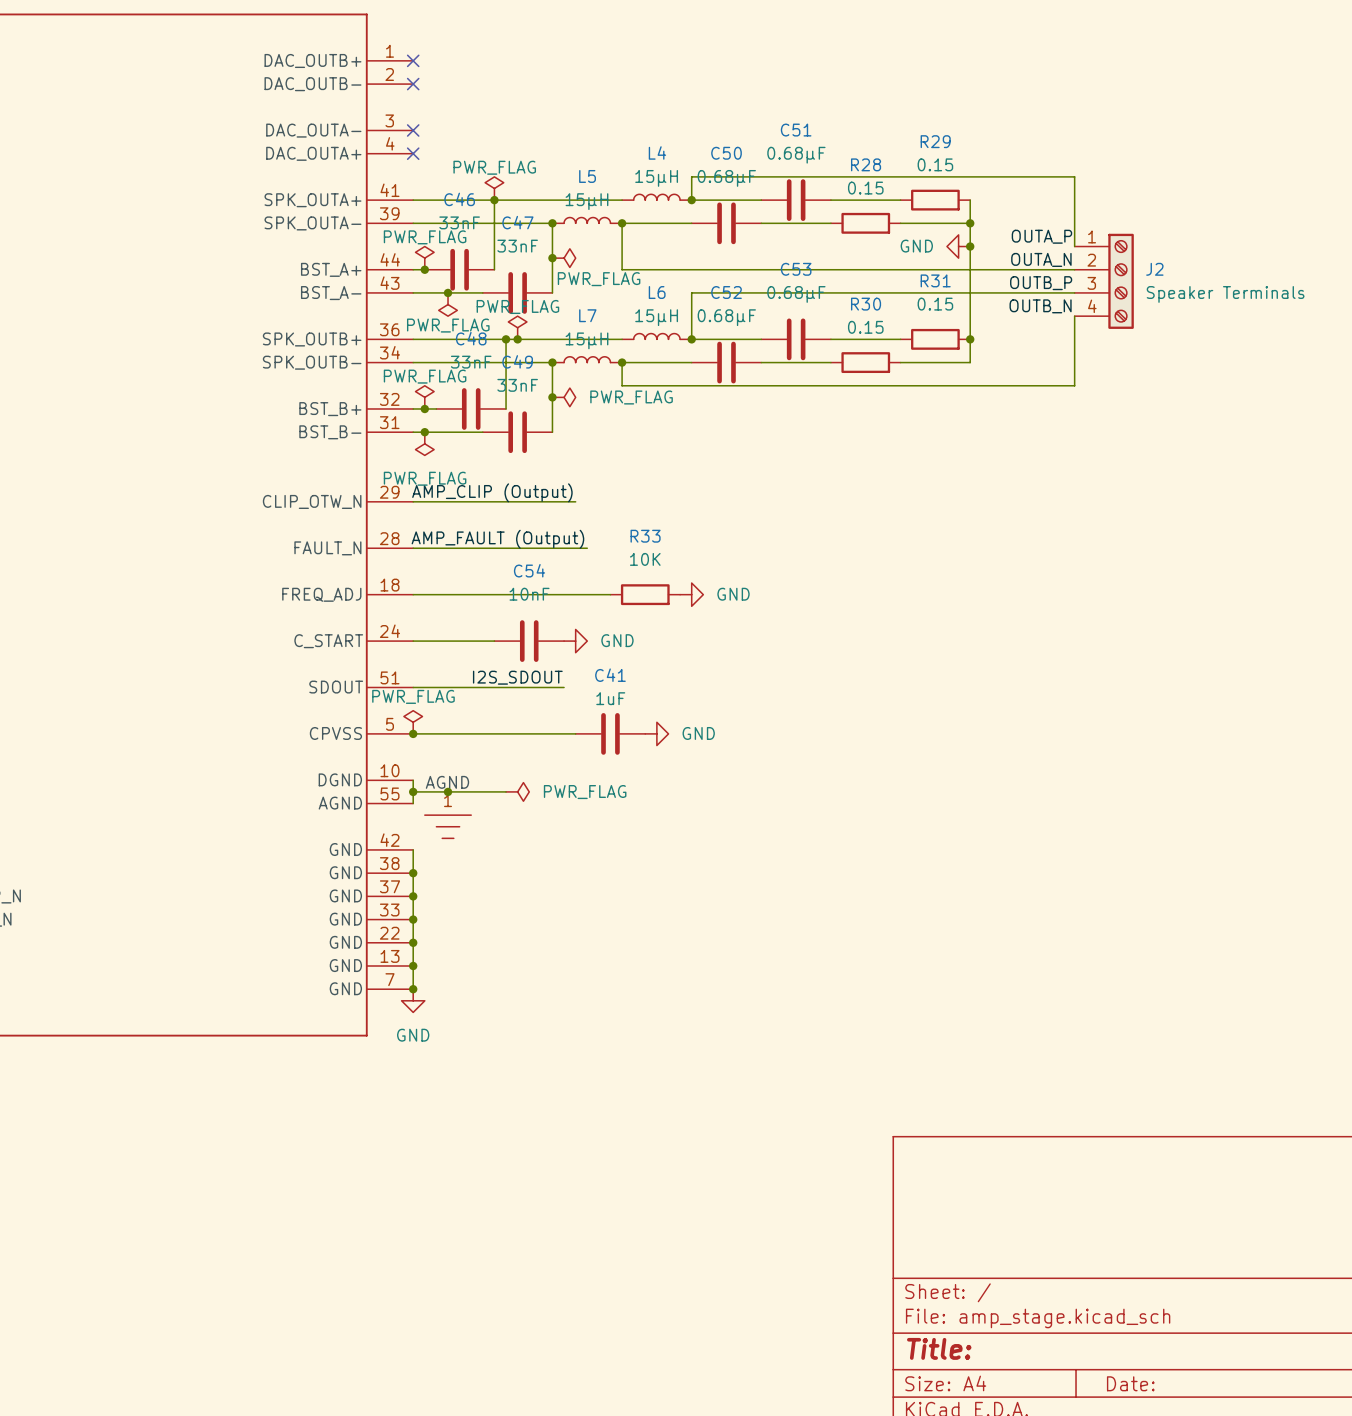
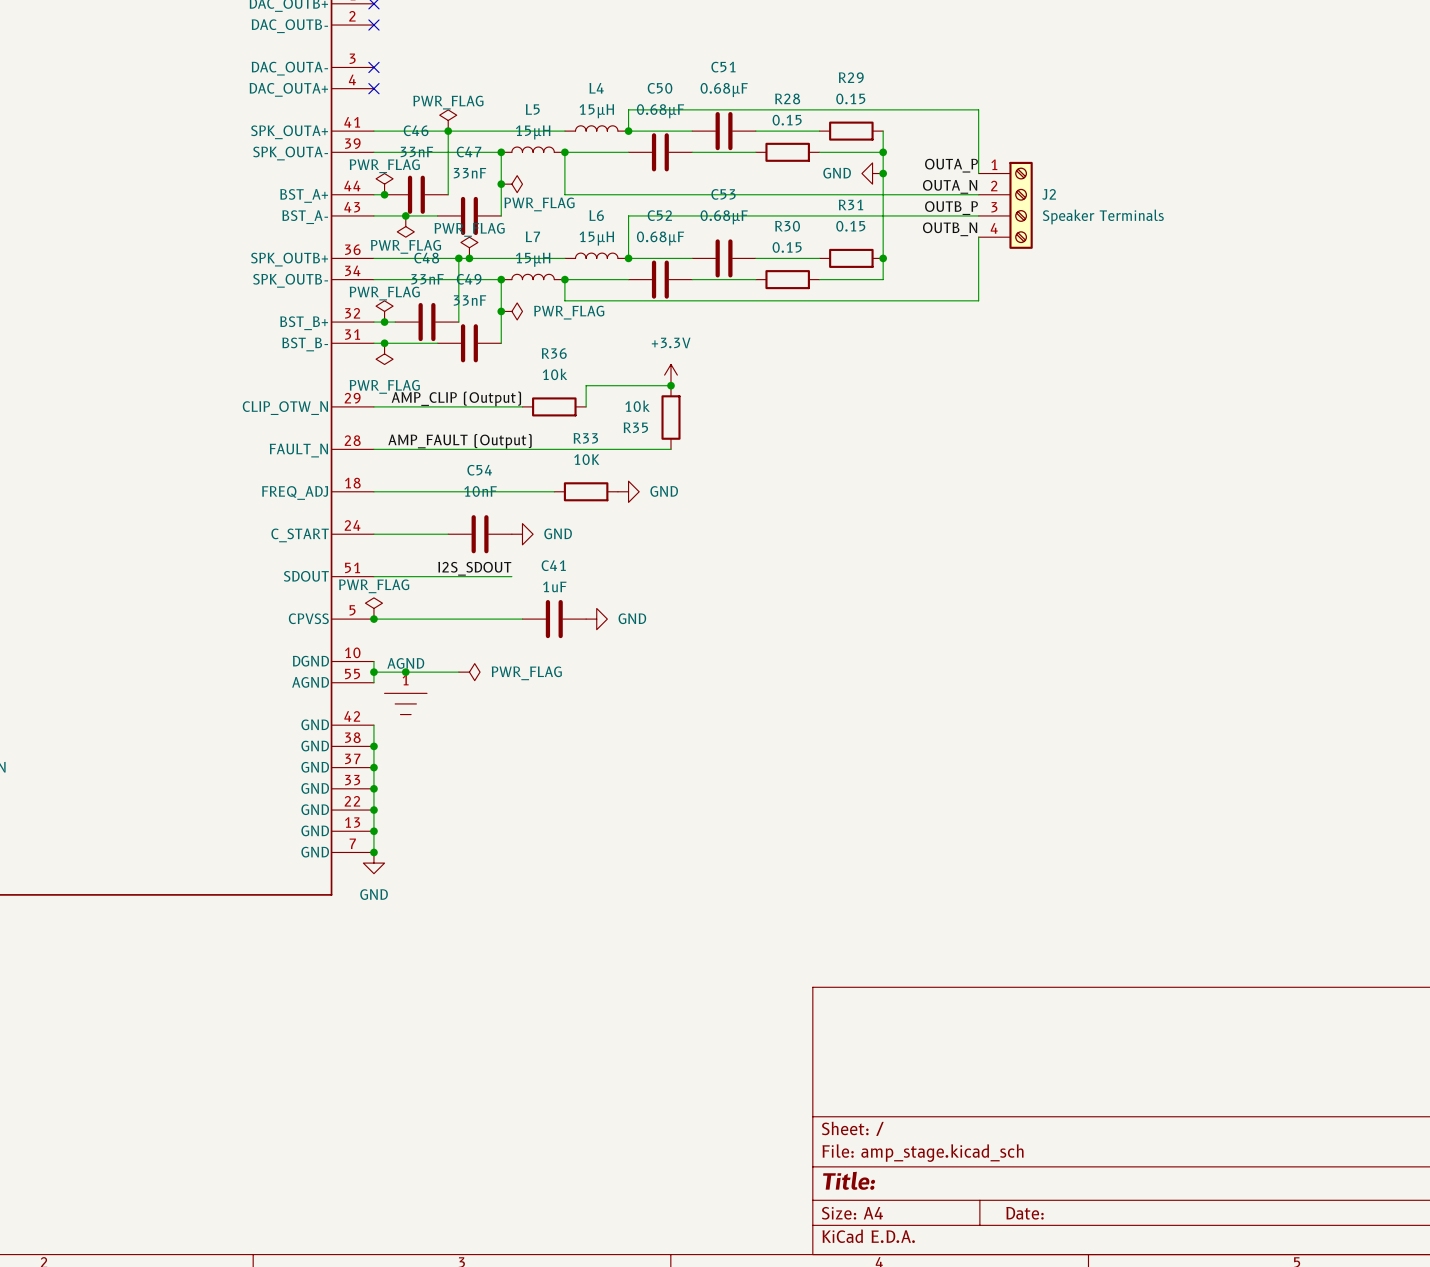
power symbol: none -> +3.3V (671, 375)
wire: none -> (671, 385) (586, 385) (586, 406)
junction: none -> (671, 385)
R36: none -> 10k (554, 406)
R35: none -> 10k (671, 417)
wire: none -> (533, 449) (671, 449)

